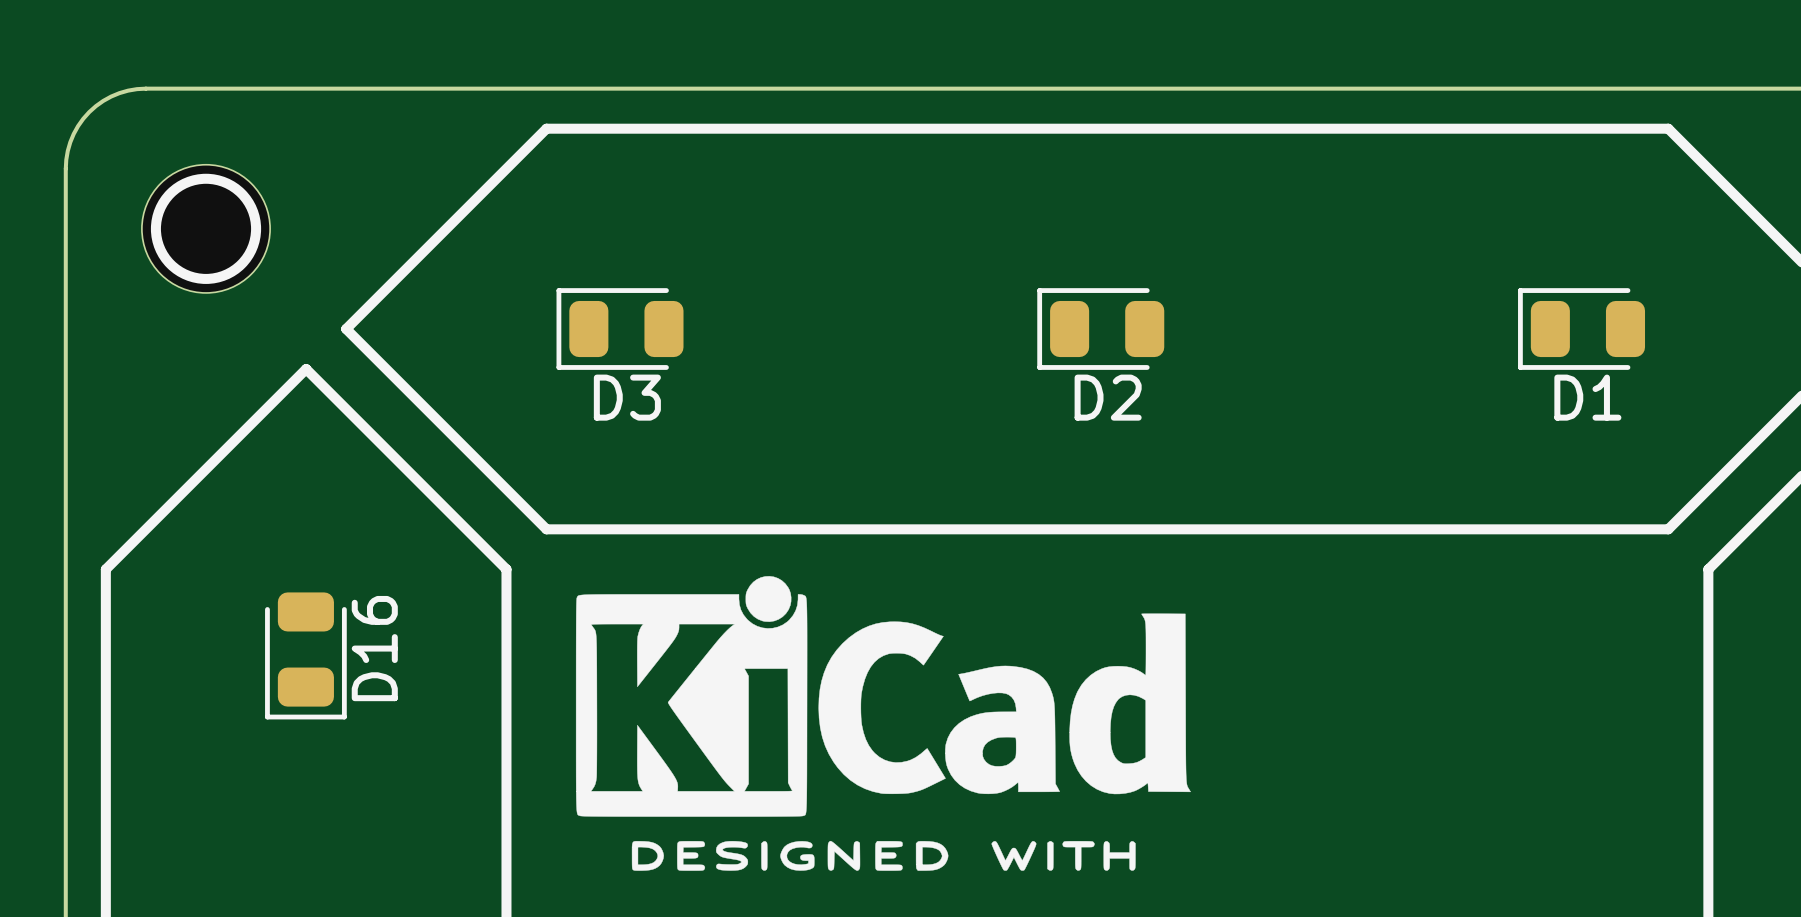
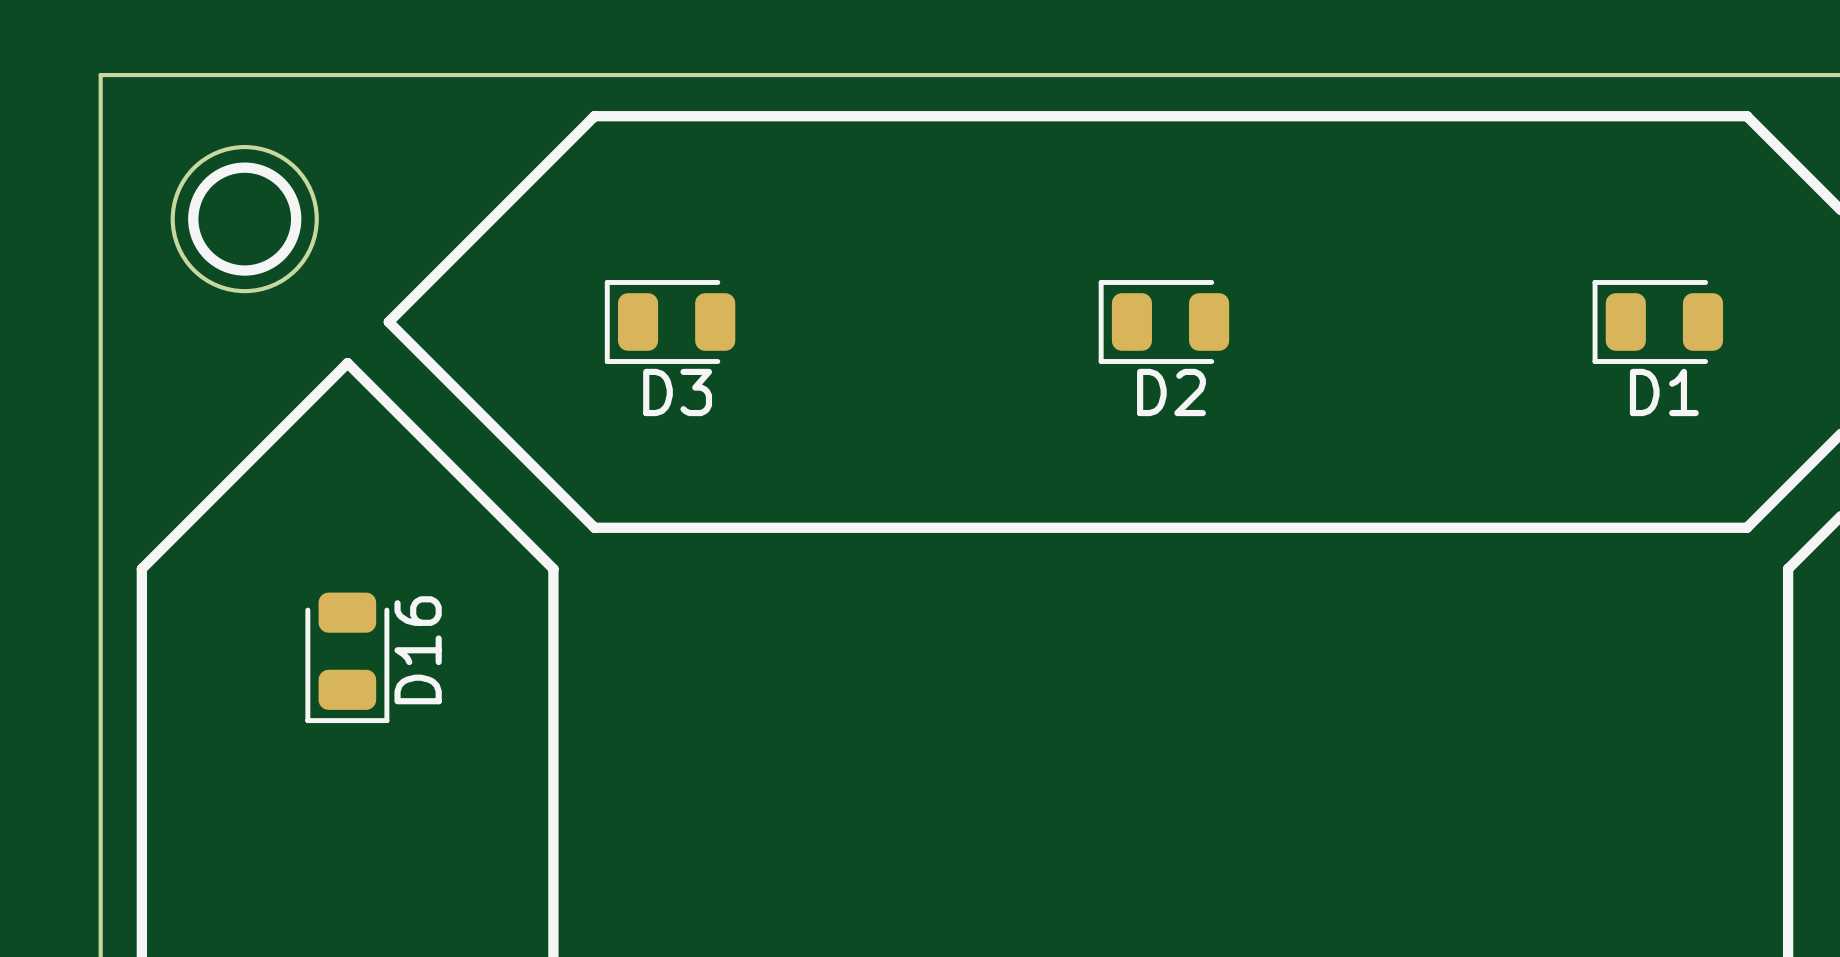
board edge: (145, 88) (119, 93) (103, 100) (89, 112) (78, 126) (70, 142) (65, 168) -> (182, 75) (100, 75) (100, 157)
round board edge: none -> [170, 145, 319, 294]
part: (206, 228) -> none
drawing: [575, 576, 1191, 871] -> none

